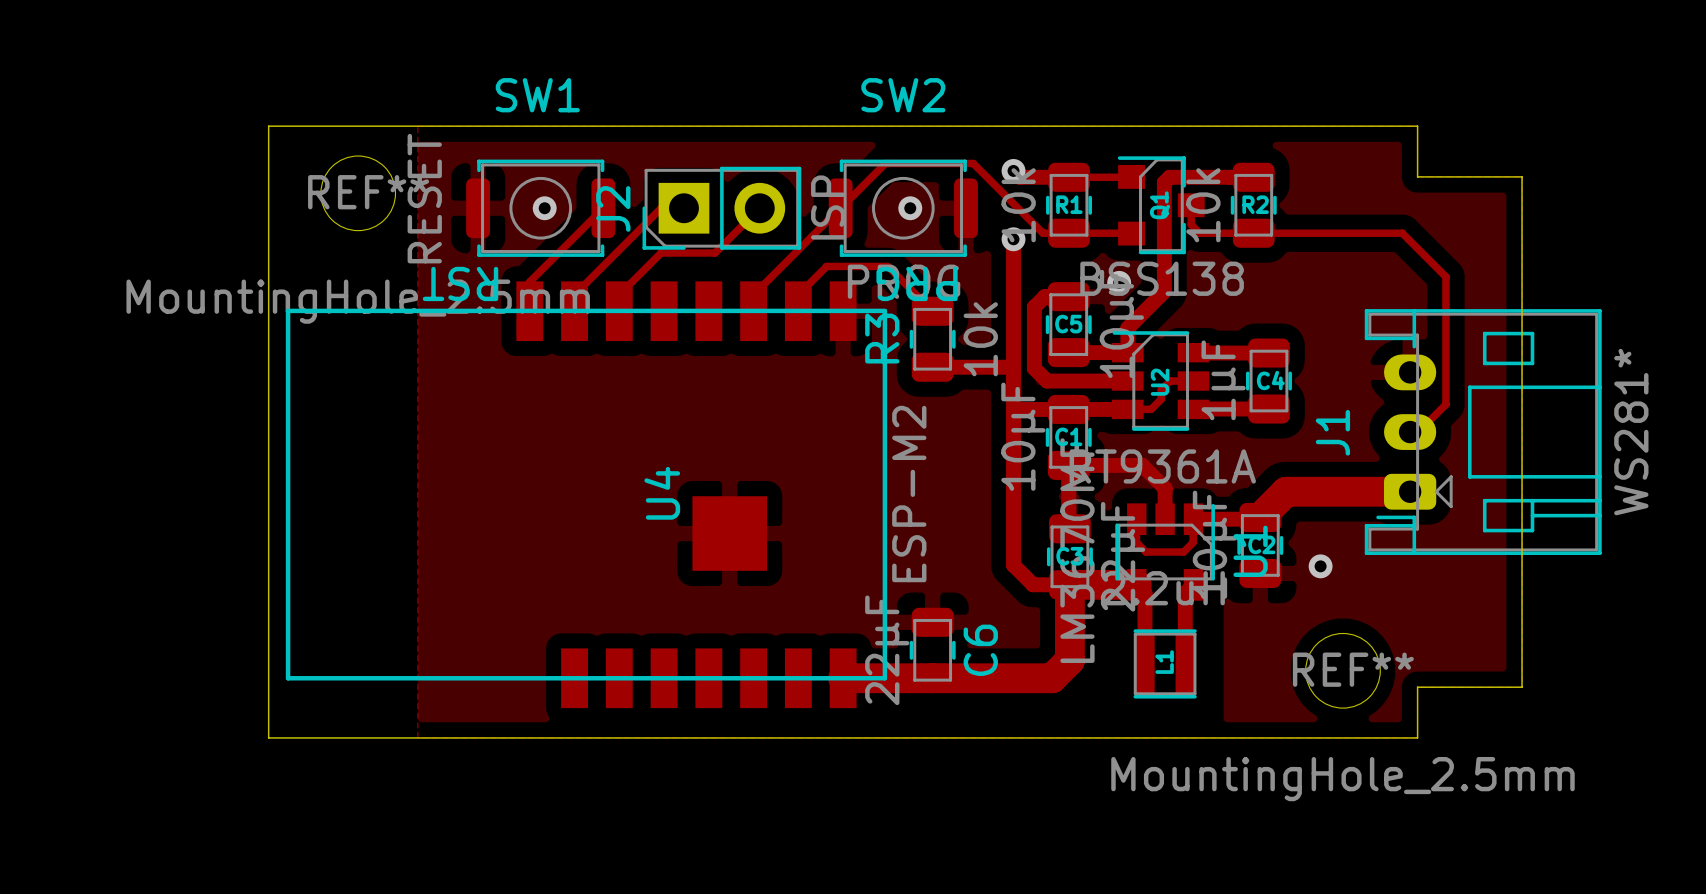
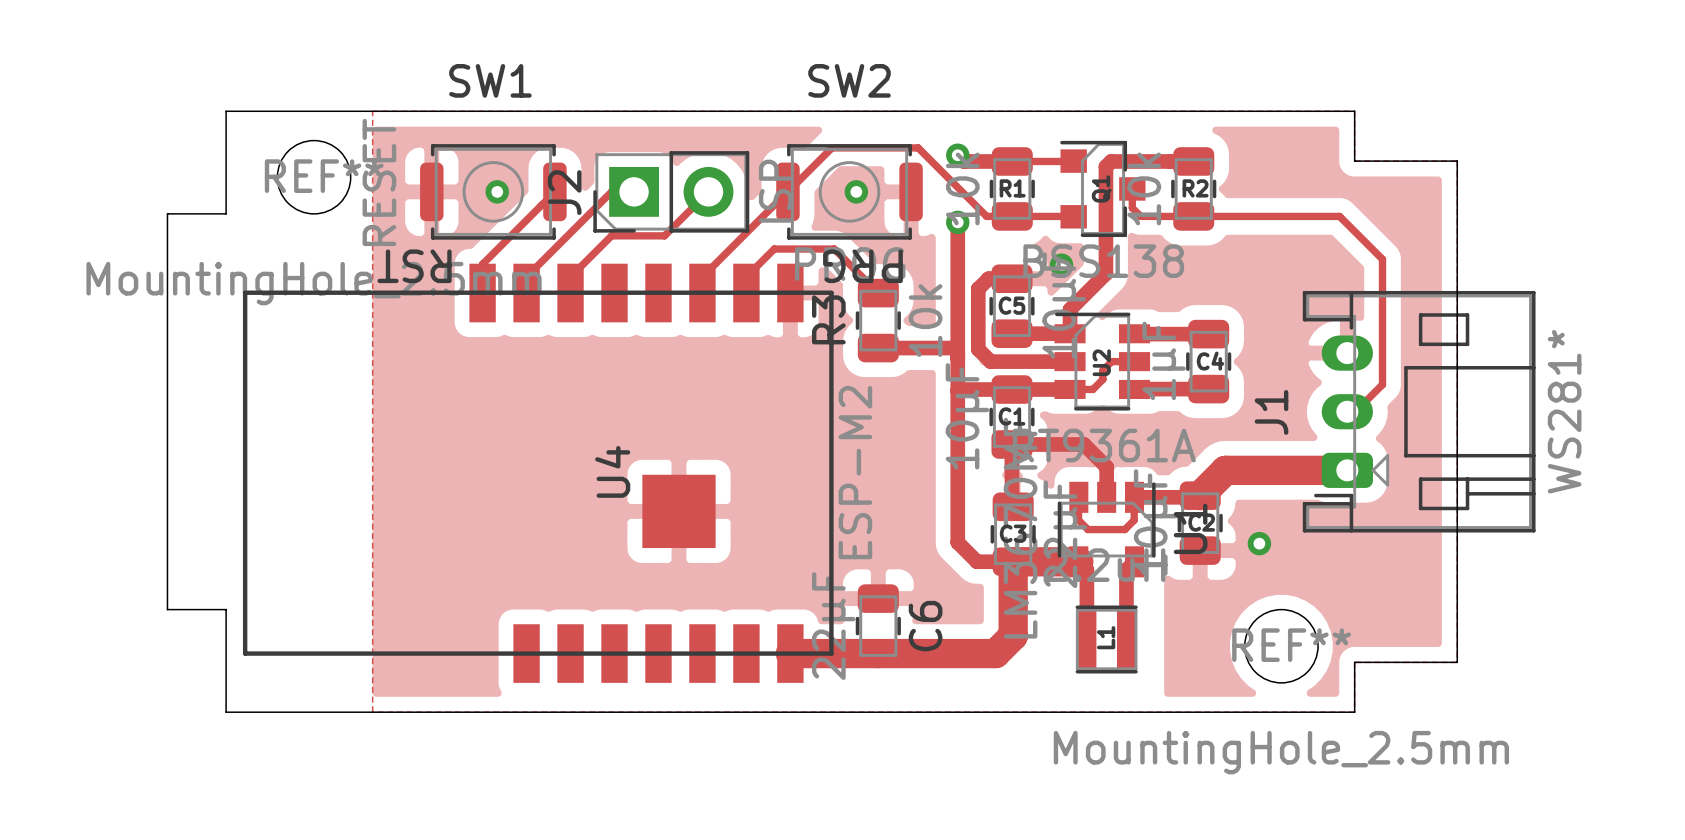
board edge: (268, 230) (268, 633) -> (226, 213) (167, 213) (167, 609) (226, 609)

